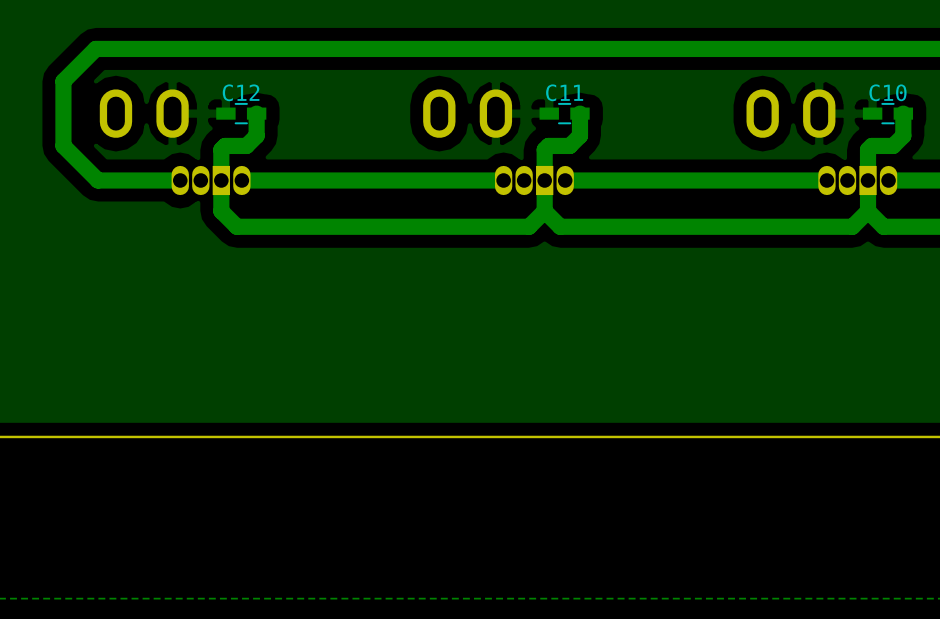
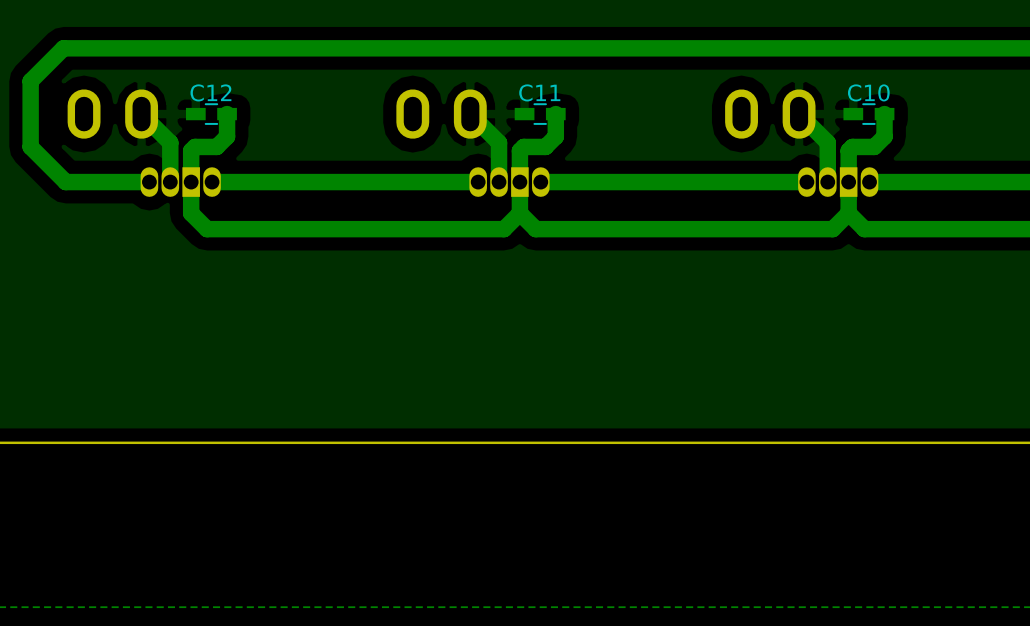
bottom track: none -> (141, 114) (170, 142) (170, 182)
bottom track: none -> (470, 114) (499, 142) (499, 182)
bottom track: none -> (799, 114) (827, 142) (827, 182)

